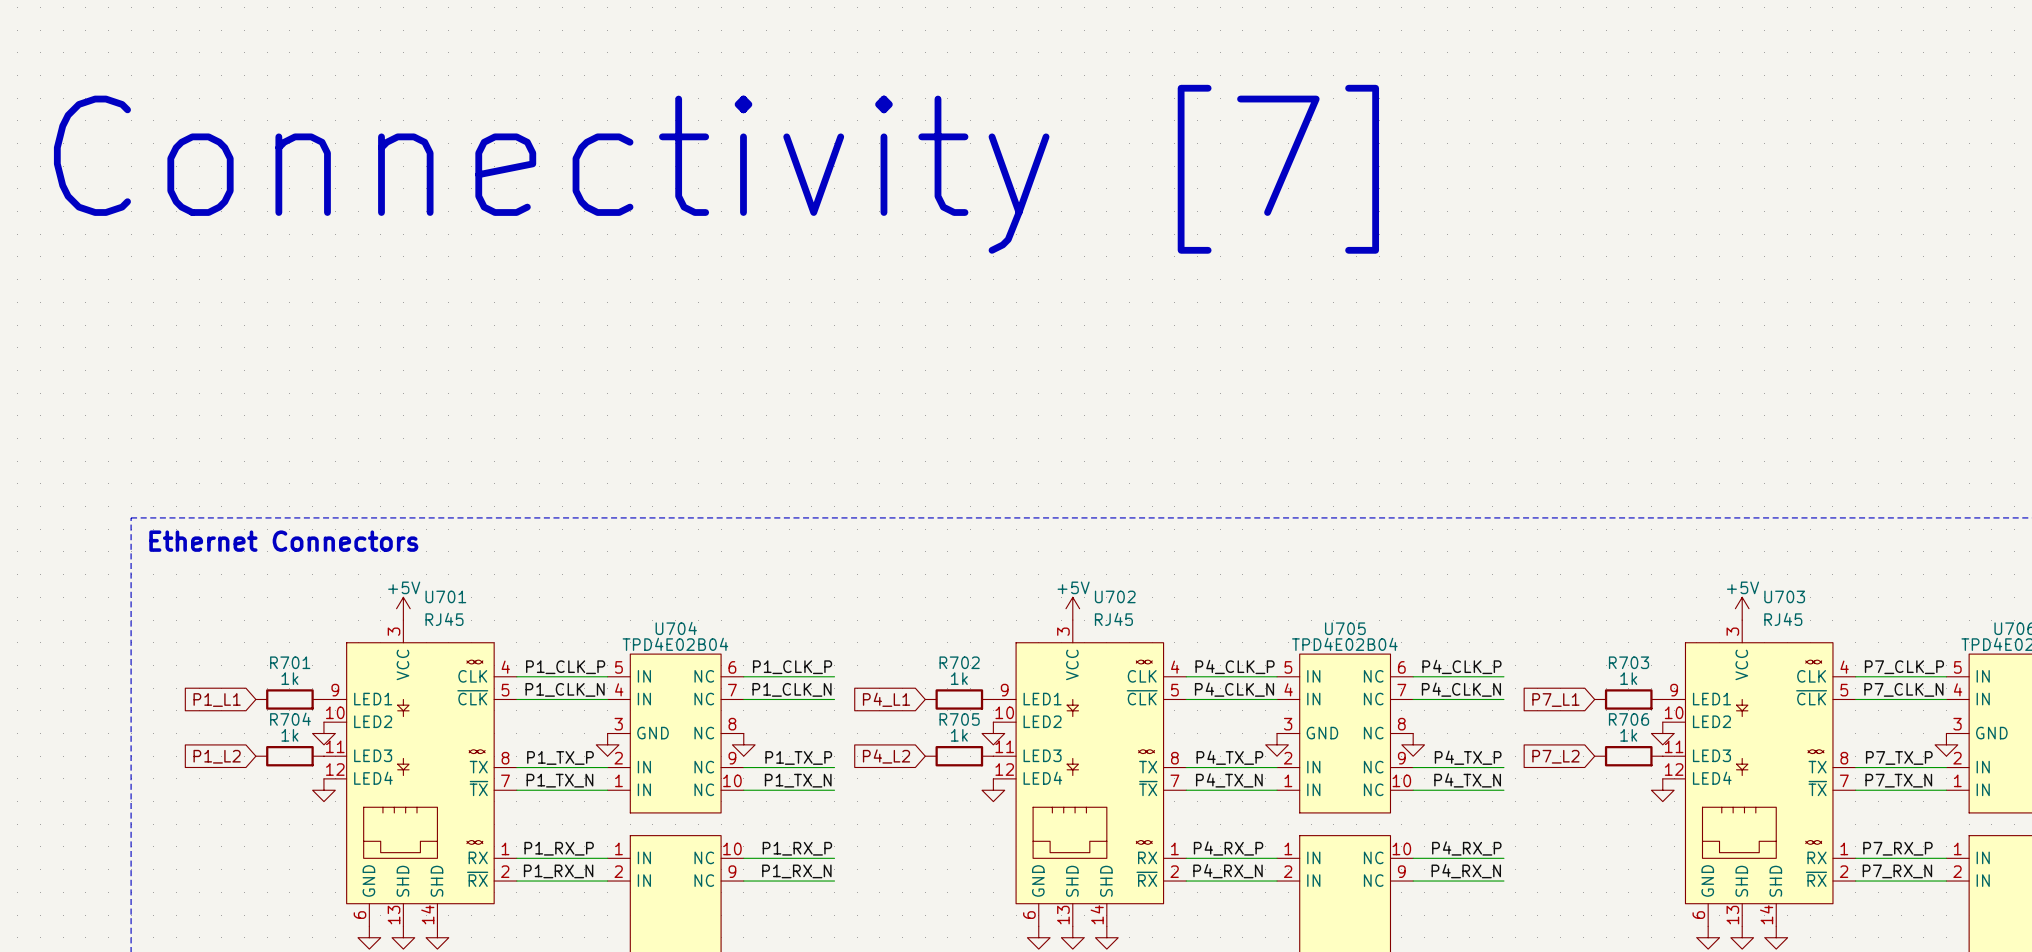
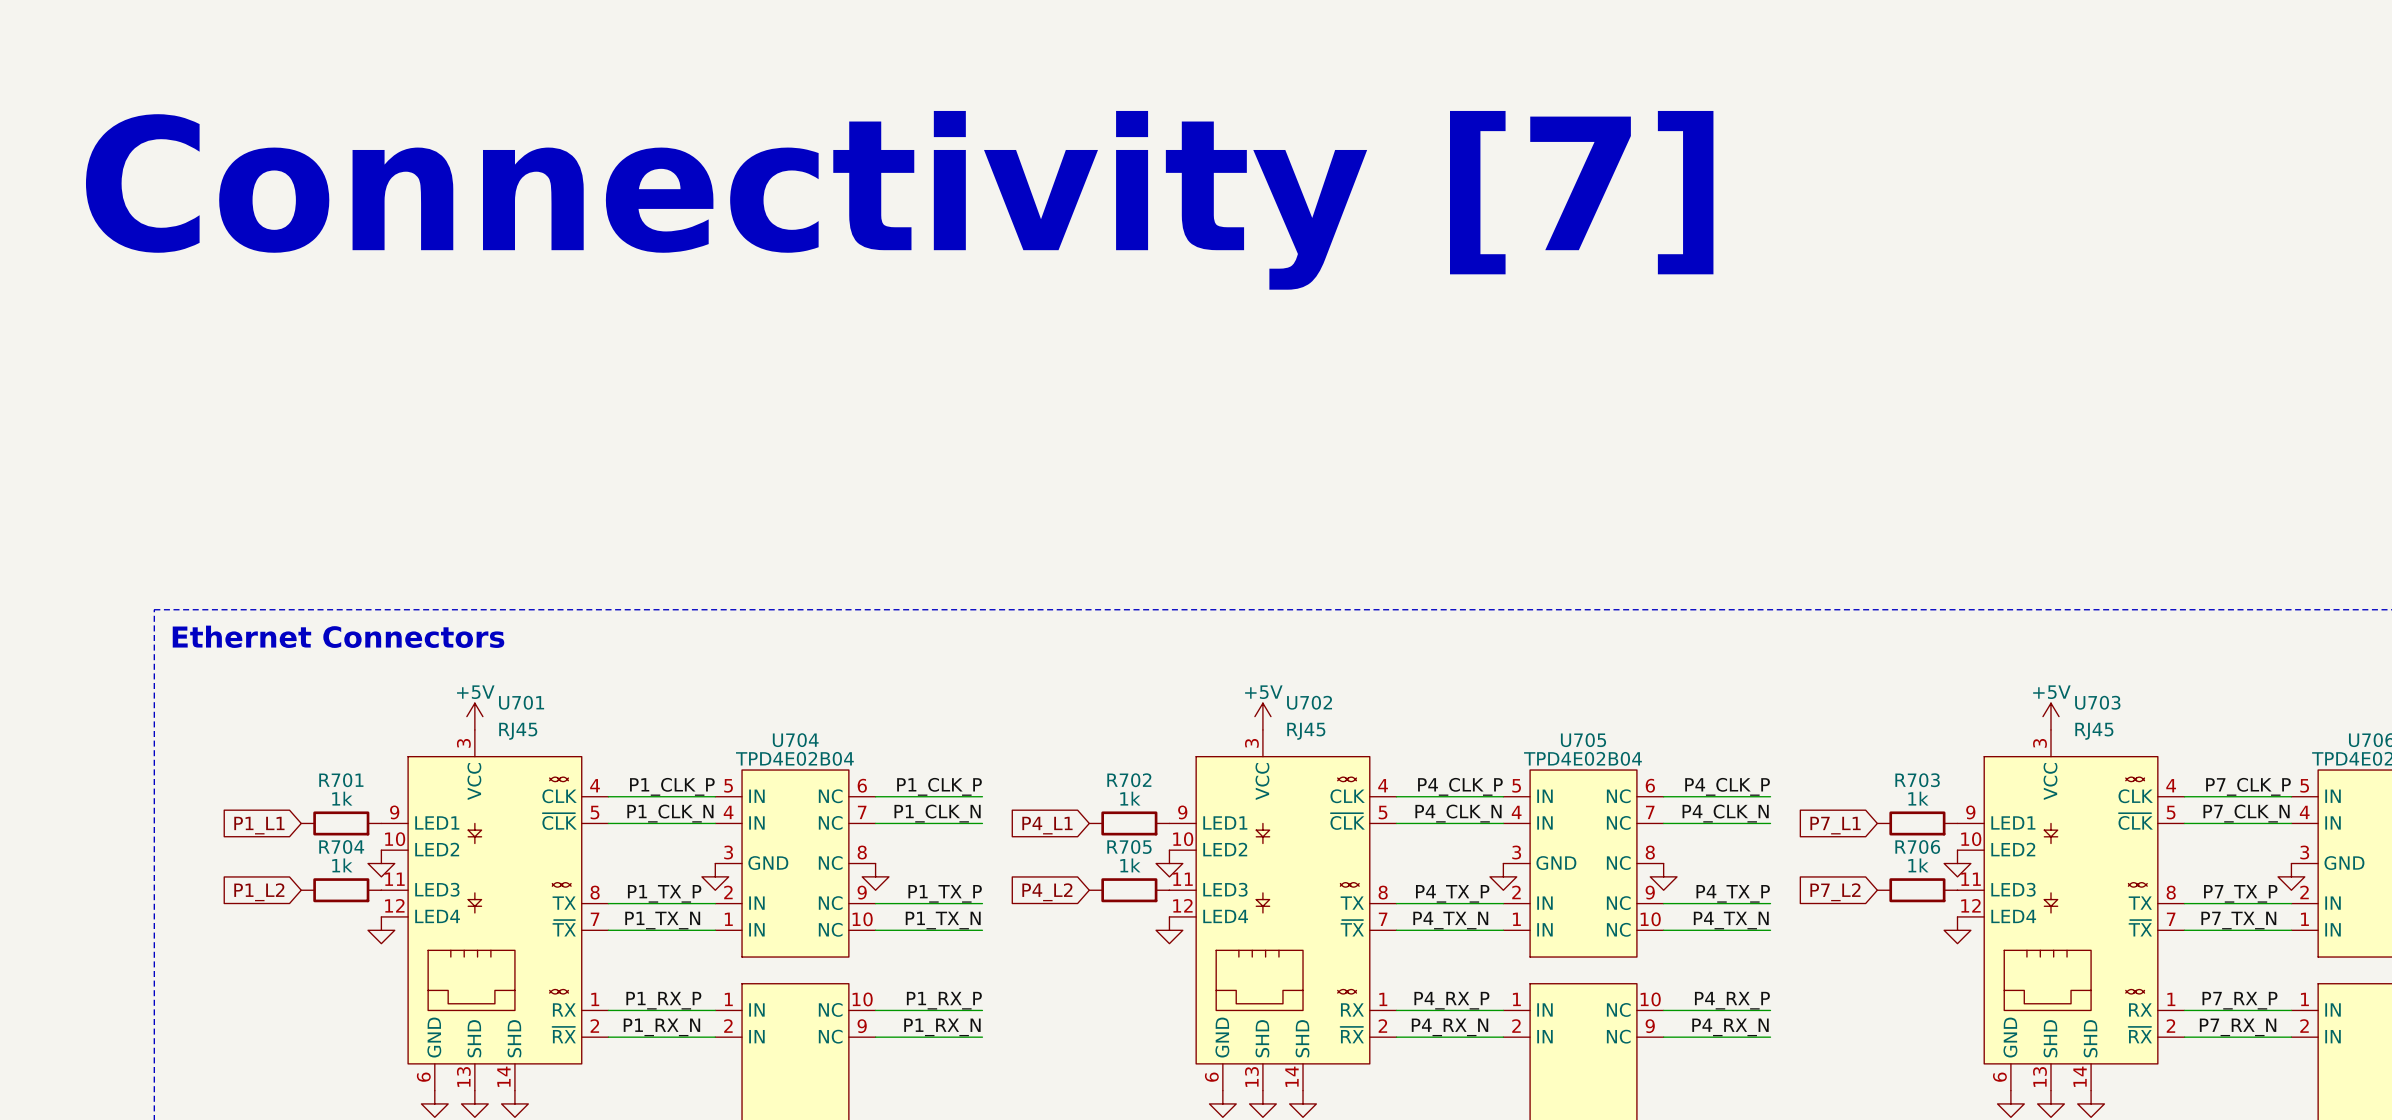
text position: Connectivity [7] (716, 169) -> Connectivity [7] (899, 200)

